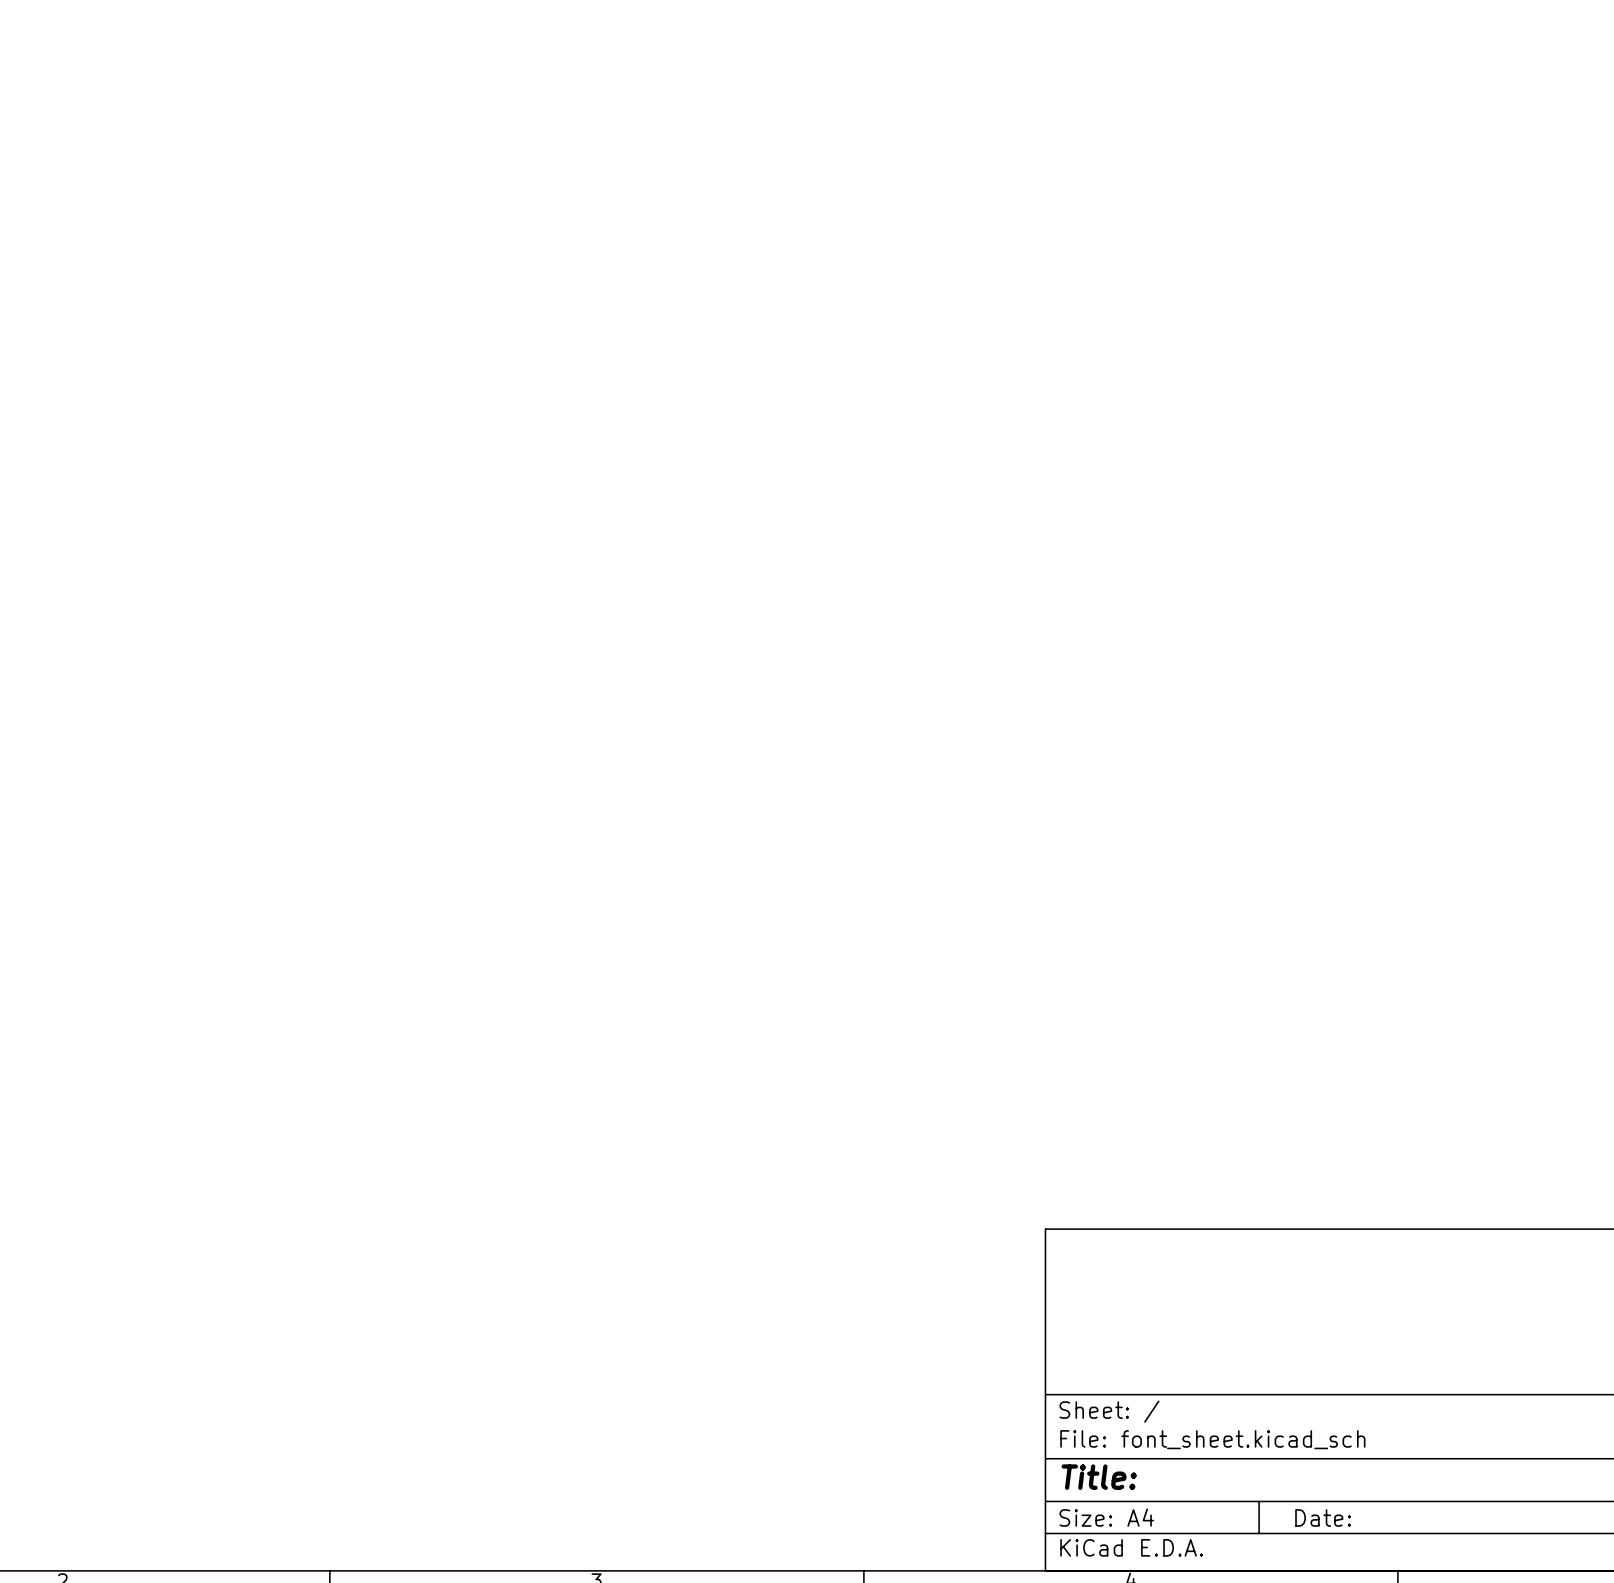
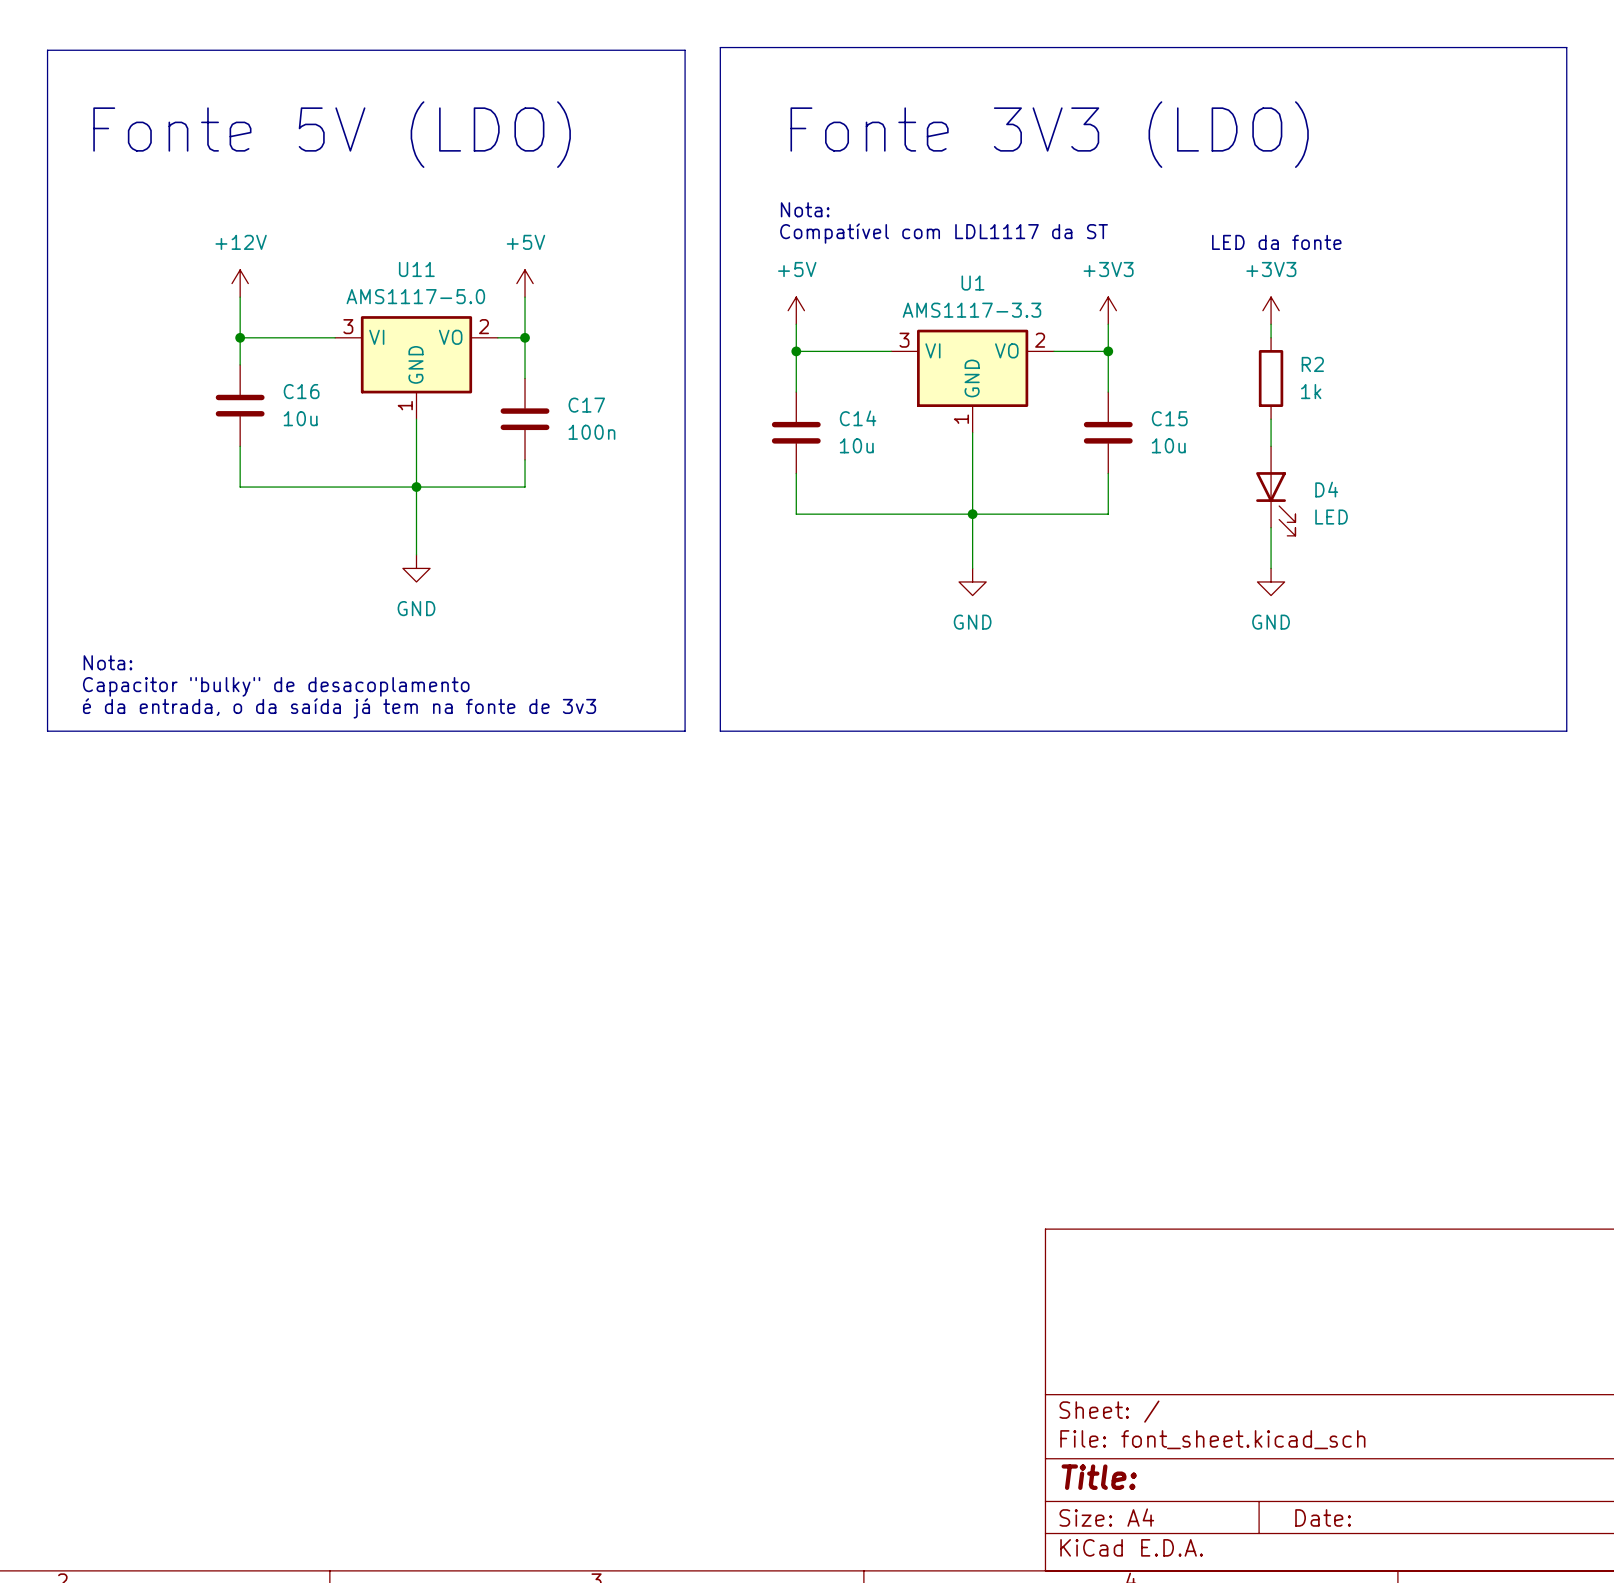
line: none -> (720, 47) (1566, 47) (1566, 731) (720, 731) (720, 47)
line: none -> (47, 50) (685, 50) (685, 731) (47, 731) (47, 50)
text: none -> Fonte 5V (LDO) (332, 134)
text: none -> Fonte 3V3 (LDO) (1049, 134)
text: none -> Nota: (805, 209)
text: none -> Compatível com LDL1117 da ST (944, 233)
text: none -> LED da fonte (1276, 242)
power symbol: none -> +12V (240, 283)
power symbol: none -> +5V (525, 283)
wire: none -> (240, 297) (240, 364)
wire: none -> (525, 297) (525, 378)
power symbol: none -> +5V (796, 310)
power symbol: none -> +3V3 (1108, 310)
power symbol: none -> +3V3 (1271, 310)
wire: none -> (796, 324) (796, 392)
wire: none -> (1108, 324) (1108, 392)
wire: none -> (1271, 324) (1271, 337)
wire: none -> (240, 337) (335, 337)
junction: none -> (240, 337)
wire: none -> (497, 337) (525, 337)
junction: none -> (525, 337)
wire: none -> (796, 351) (891, 351)
junction: none -> (796, 351)
wire: none -> (1054, 351) (1108, 351)
junction: none -> (1108, 351)
U11: none -> AMS1117-5.0 (416, 367)
R2: none -> 1k (1271, 378)
U1: none -> AMS1117-3.3 (972, 381)
C16: none -> 10u (240, 405)
wire: none -> (416, 419) (416, 554)
C17: none -> 100n (525, 419)
wire: none -> (1271, 419) (1271, 446)
C14: none -> 10u (796, 432)
wire: none -> (972, 432) (972, 568)
C15: none -> 10u (1108, 432)
wire: none -> (240, 446) (240, 487) (525, 487) (525, 459)
wire: none -> (796, 473) (796, 514) (1108, 514) (1108, 473)
junction: none -> (416, 487)
D4: none -> LED (1275, 491)
junction: none -> (972, 514)
wire: none -> (1271, 527) (1271, 568)
power symbol: none -> GND (416, 568)
power symbol: none -> GND (972, 581)
power symbol: none -> GND (1271, 581)
text: none -> Nota: (107, 662)
text: none -> Capacitor "bulky" de desacoplamento (276, 686)
text: none -> é da entrada, o da saída já tem na fonte de 3v3 (339, 708)

